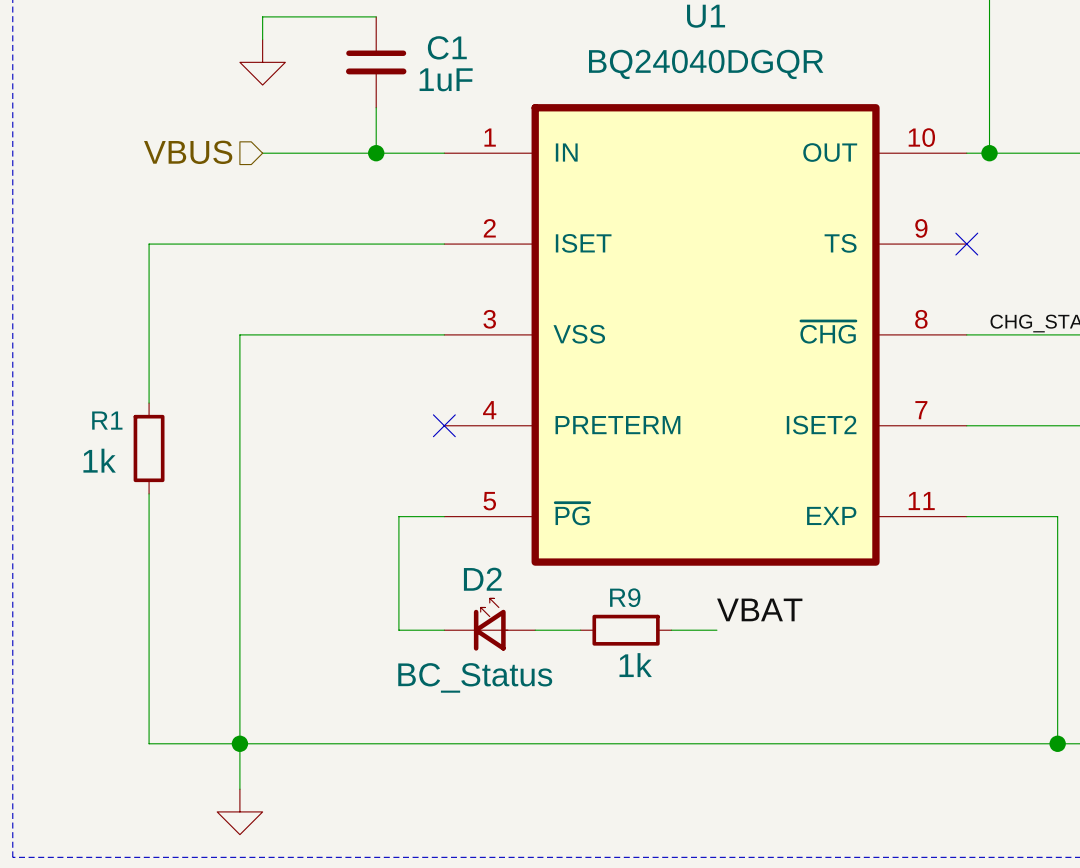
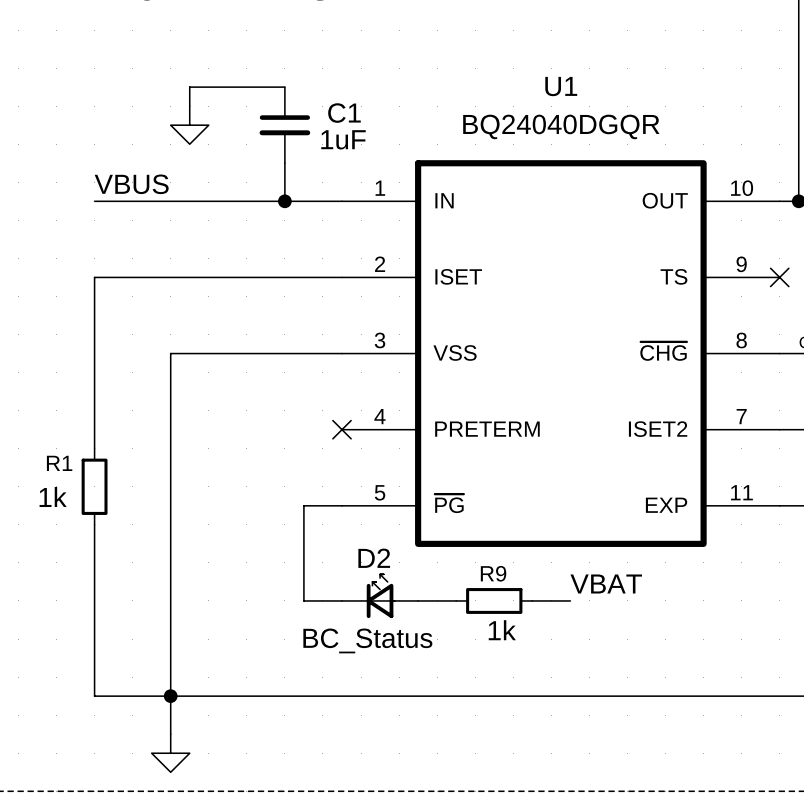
label: none -> VBUS (131, 184)
hierarchical label: VBUS (188, 152) -> none
wire: none -> (94, 201) (189, 201)
R1 position: (149, 448) -> (94, 486)
wire: (149, 493) (149, 539) -> (94, 410) (94, 448)

